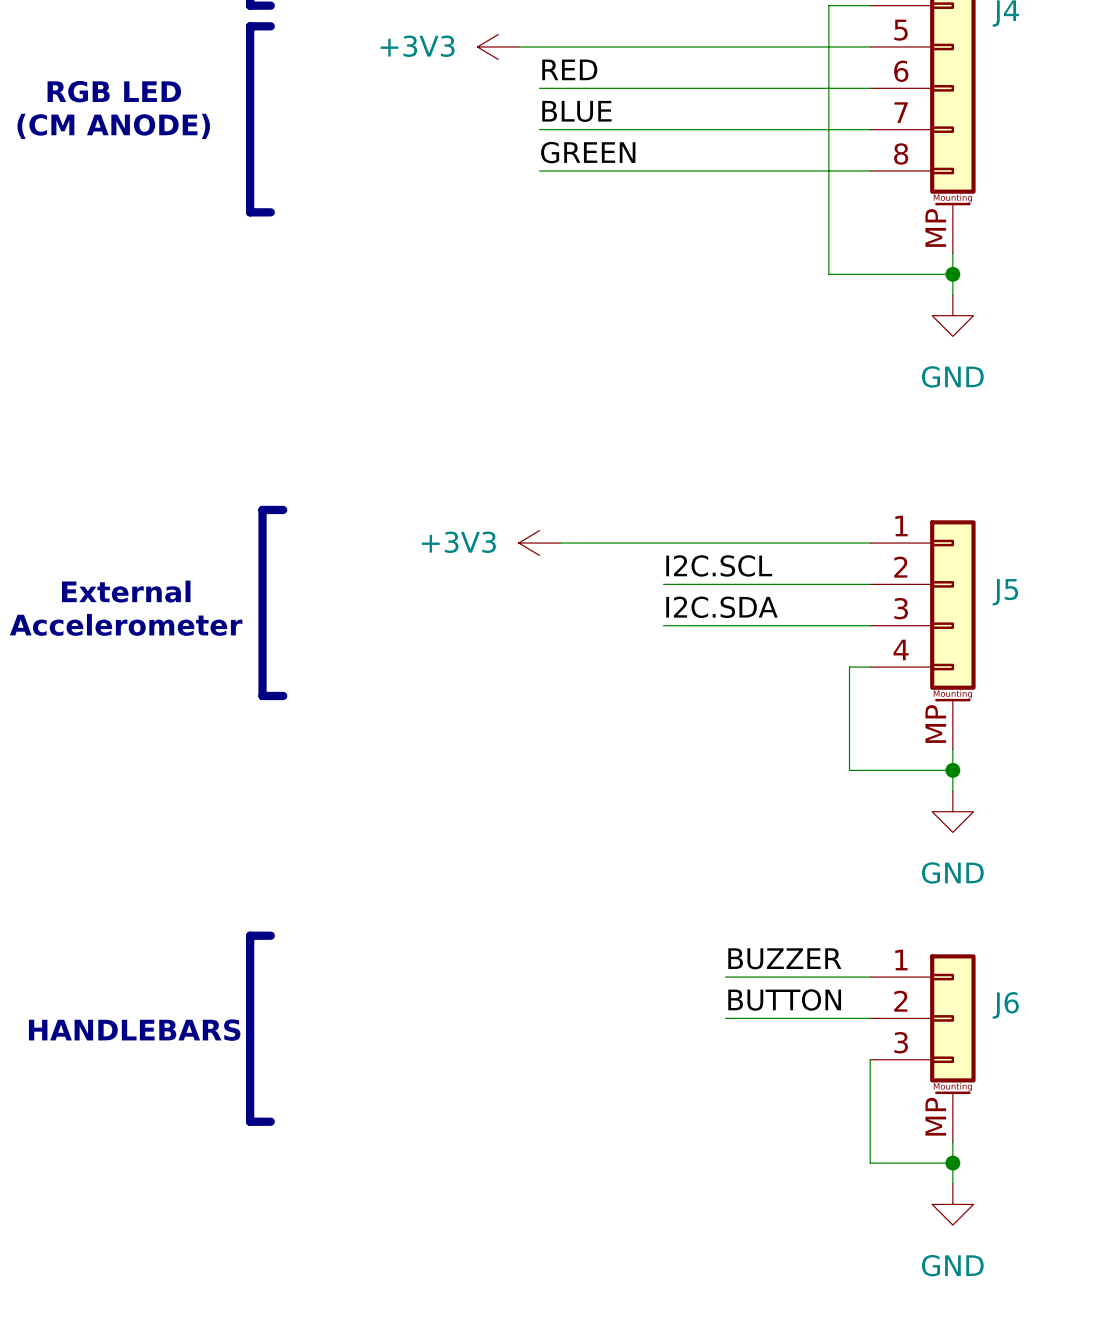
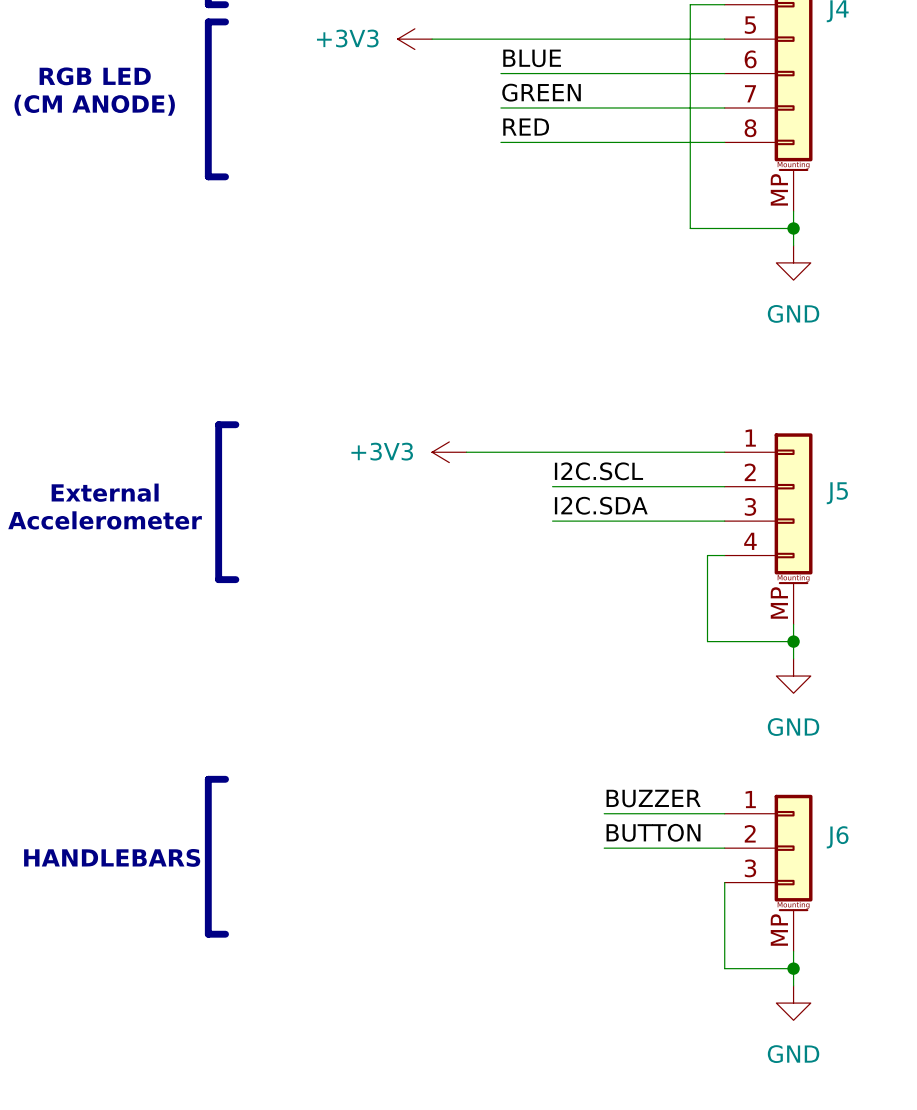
label position: RED (569, 69) -> RED (526, 127)
wire: (539, 88) (601, 88) -> none
label position: BLUE (576, 111) -> BLUE (532, 58)
wire: (539, 129) (601, 129) -> none
label position: GREEN (588, 152) -> GREEN (541, 92)
wire: (539, 171) (601, 171) -> none

